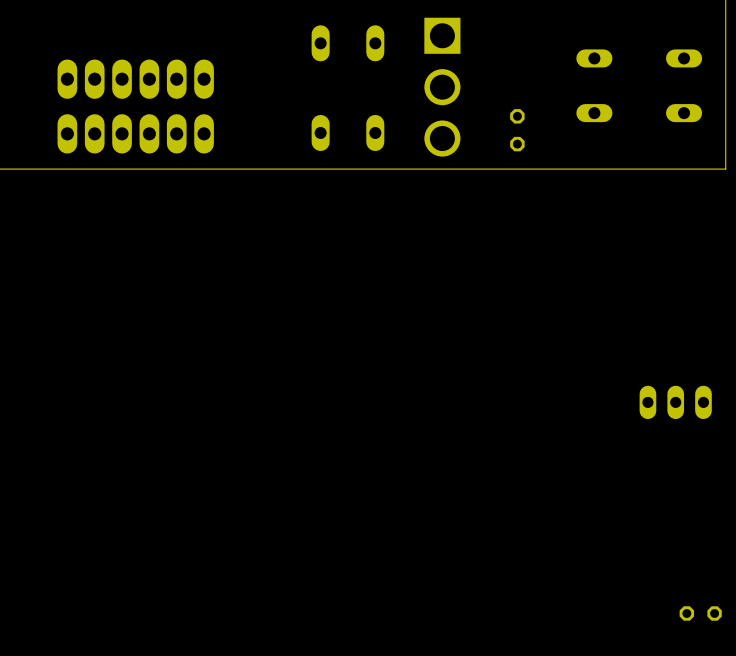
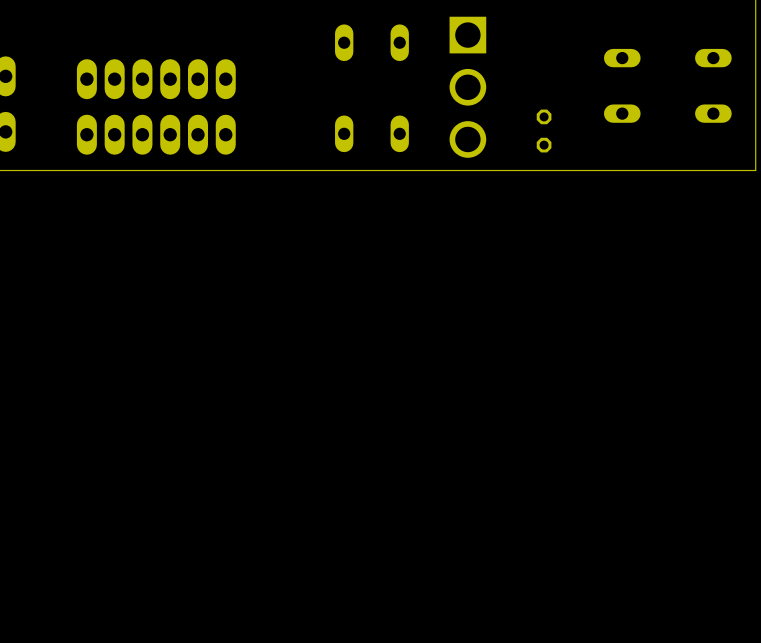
part: (675, 402) -> none
part: (700, 613) -> none

